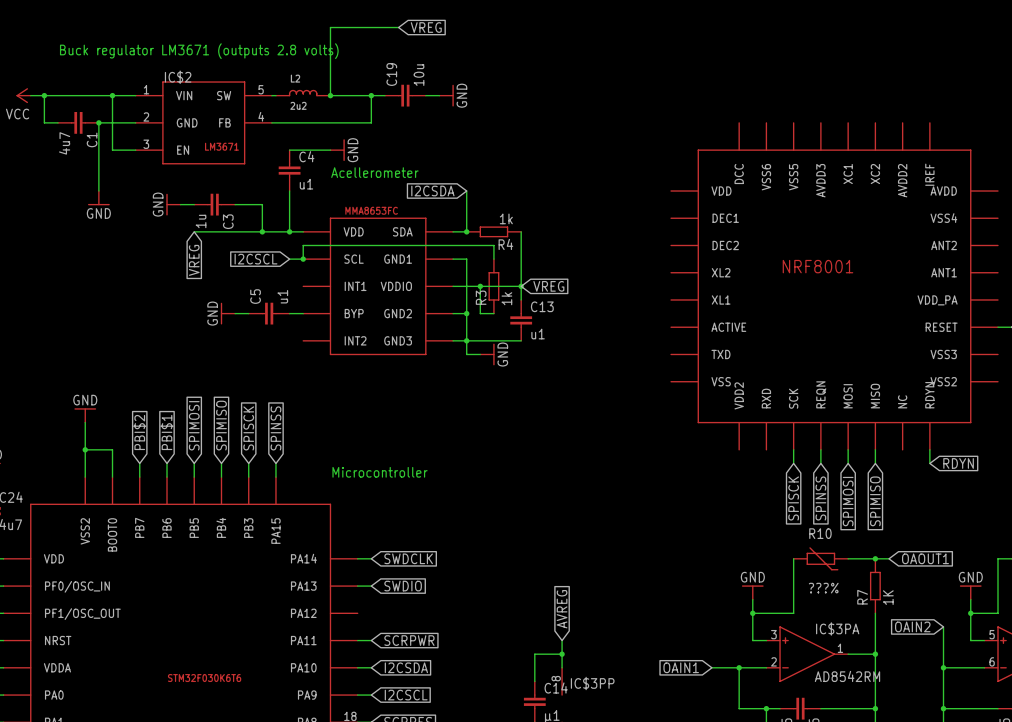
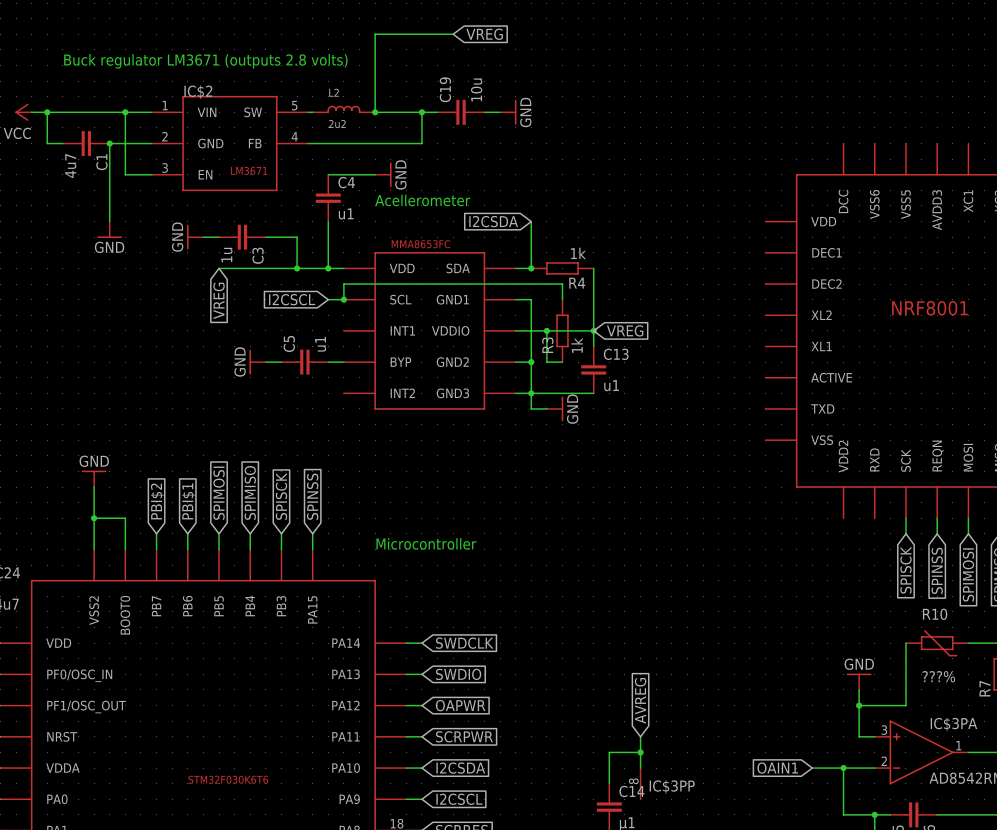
wire: none -> (406, 705) (421, 705)
global label: none -> OAPWR (460, 705)

